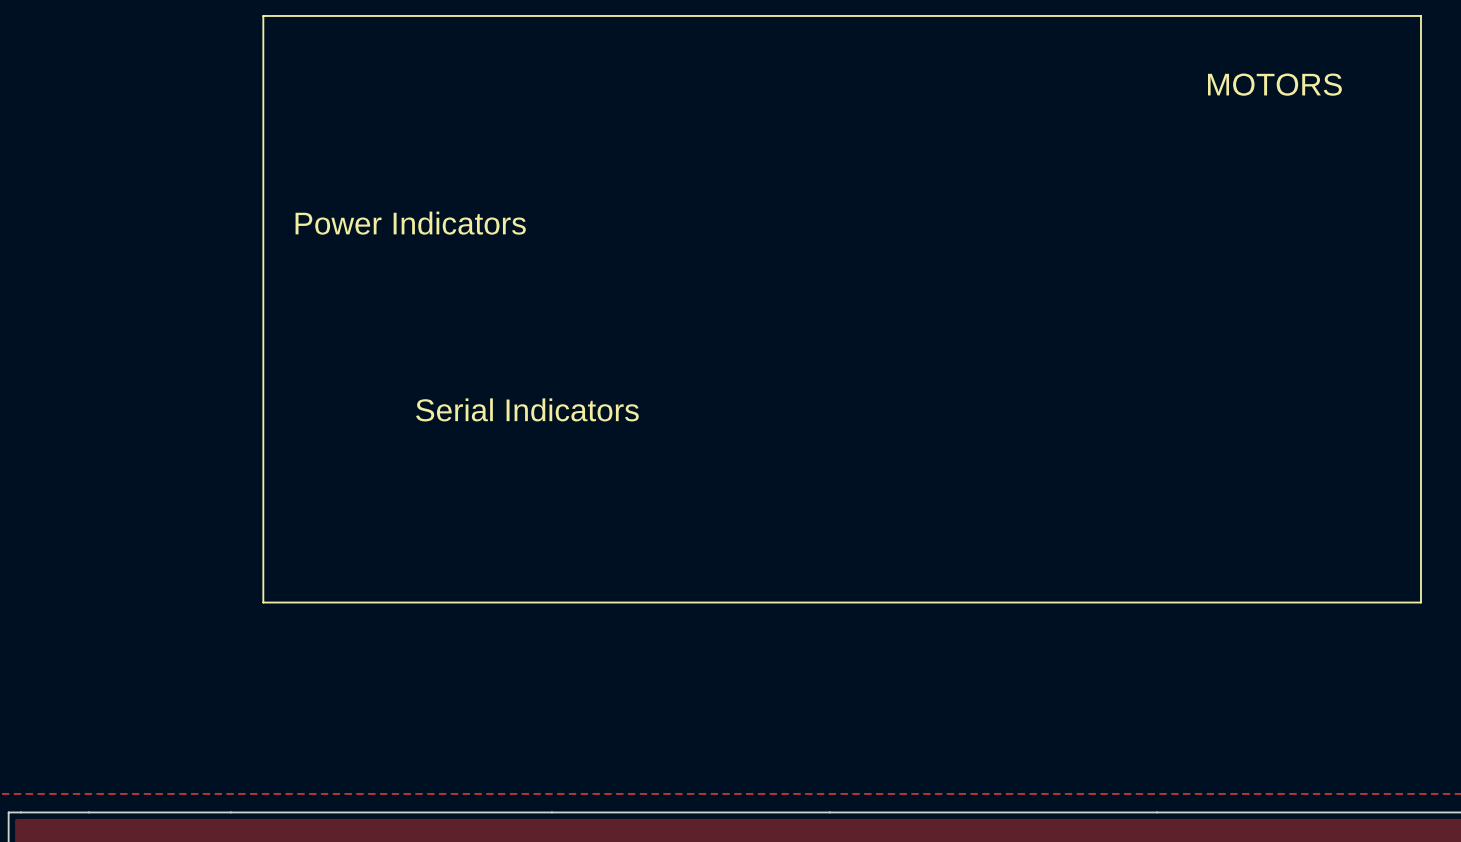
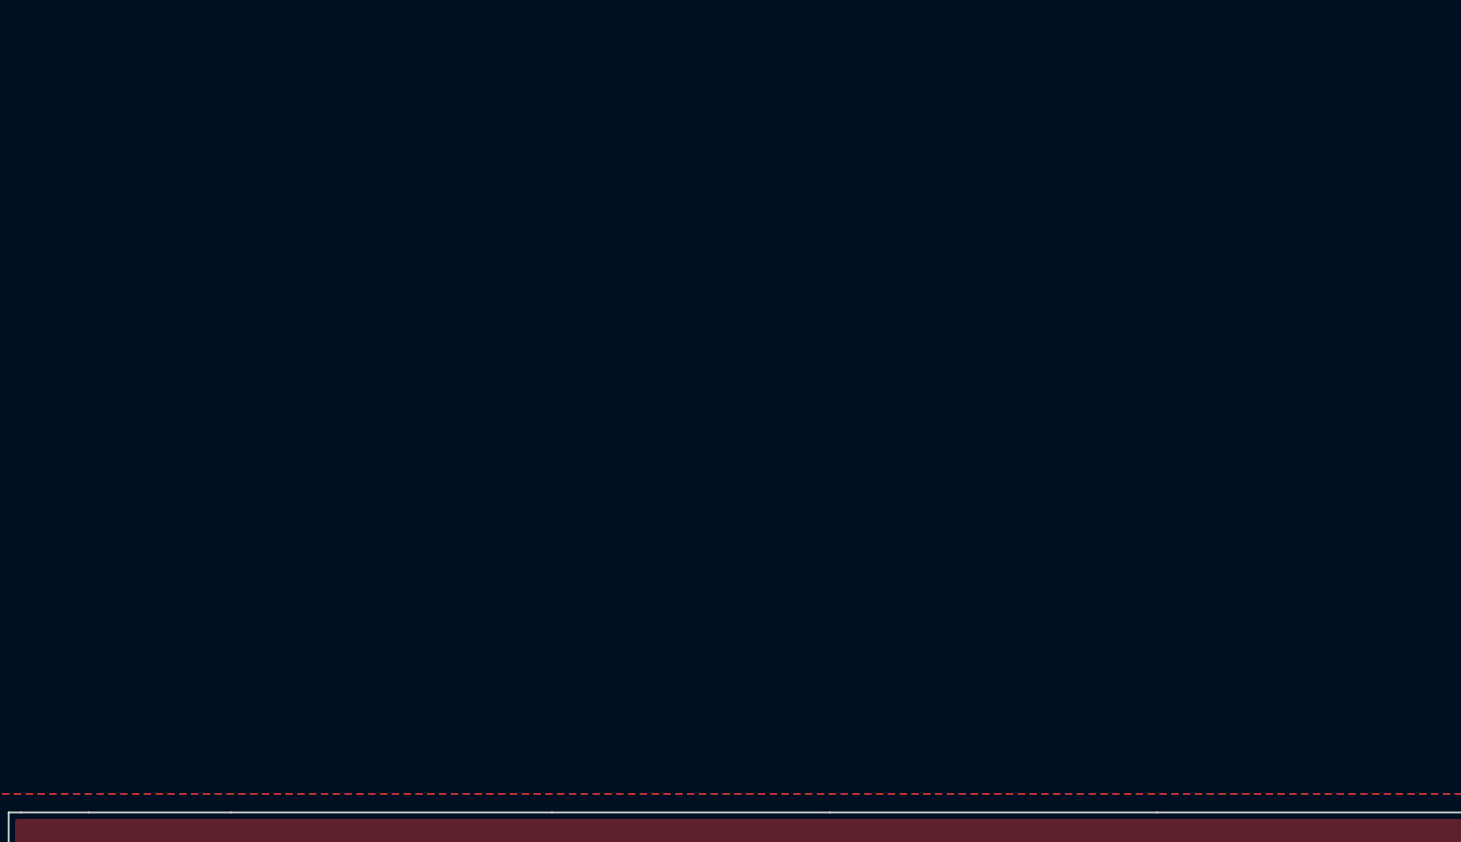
line: (263, 15) (1420, 15) (1420, 602) (263, 602) (263, 15) -> none
text: MOTORS (1274, 84) -> none
text: Power Indicators (410, 223) -> none
text: Serial Indicators (527, 409) -> none

